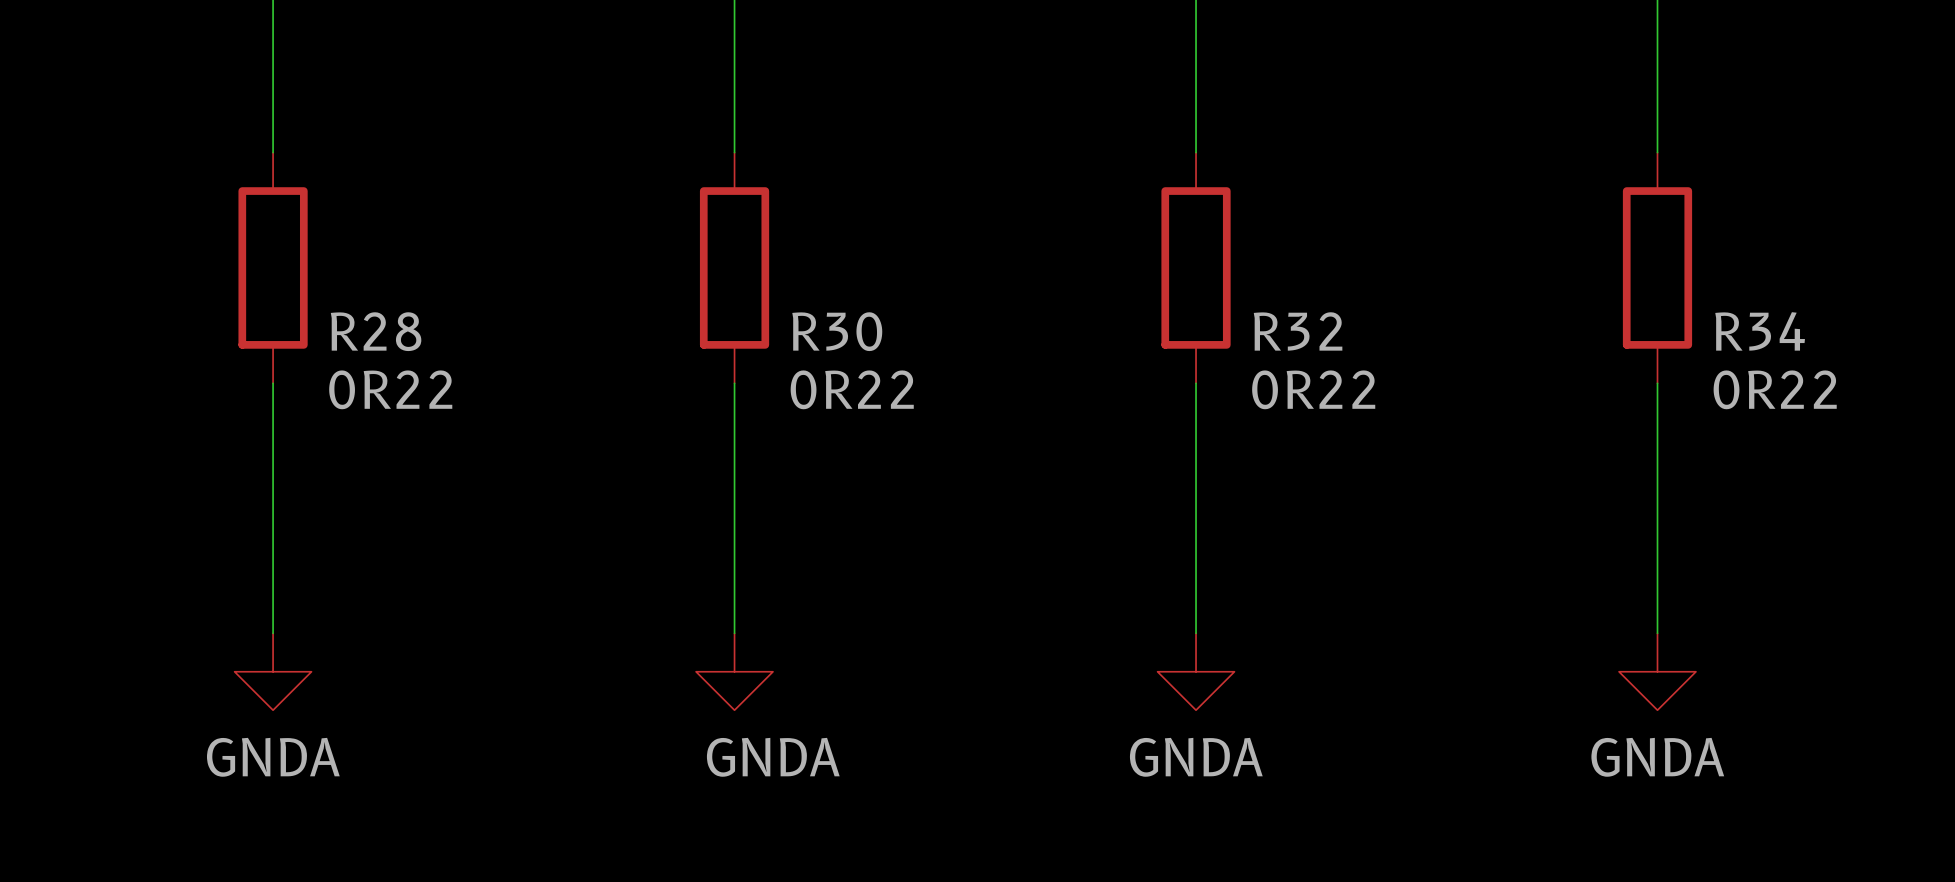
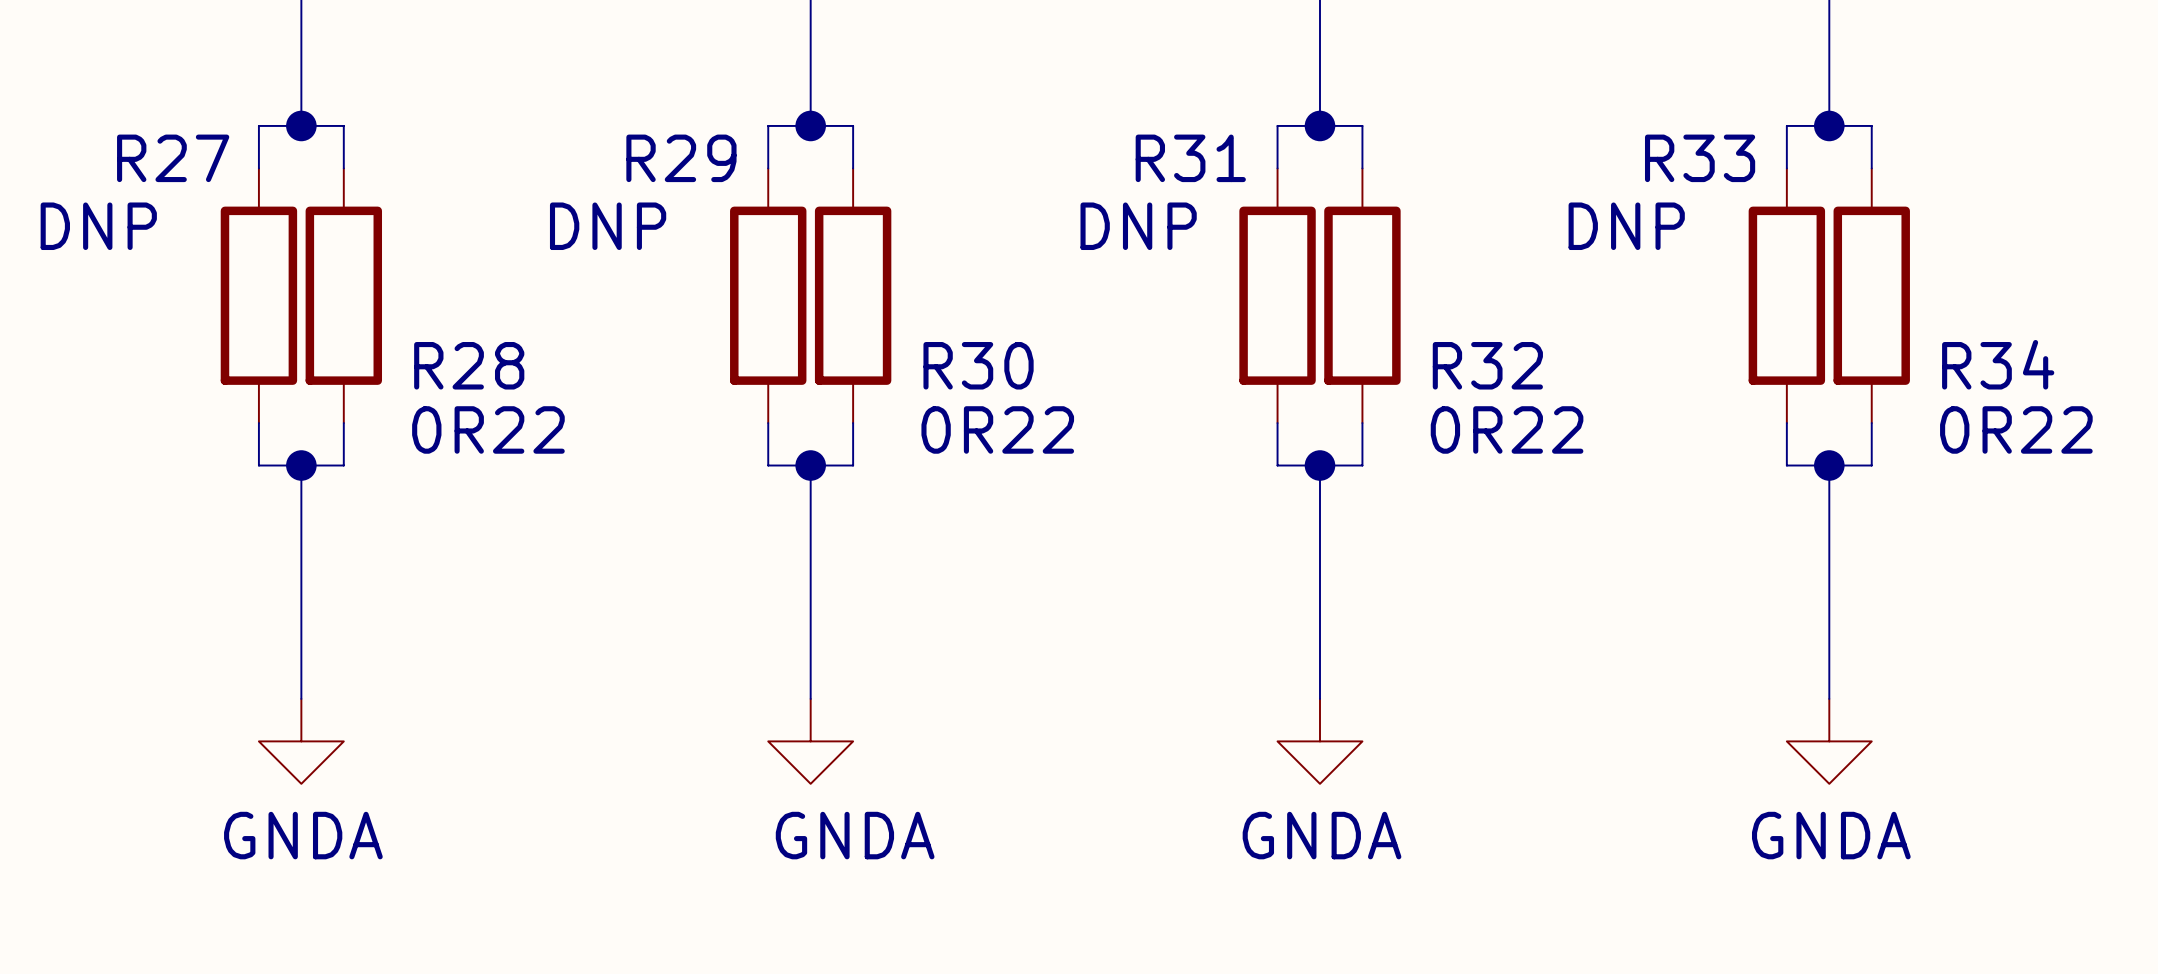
wire: (273, 114) (273, 152) -> none
junction: none -> (301, 125)
wire: (734, 114) (734, 152) -> none
junction: none -> (810, 125)
wire: (1196, 114) (1196, 152) -> none
junction: none -> (1319, 125)
wire: (1657, 114) (1657, 152) -> none
junction: none -> (1829, 125)
wire: none -> (258, 168) (258, 125) (343, 125) (343, 168)
wire: none -> (768, 168) (768, 125) (853, 125) (853, 168)
wire: none -> (1277, 168) (1277, 125) (1362, 125) (1362, 168)
wire: none -> (1786, 168) (1786, 125) (1871, 125) (1871, 168)
R27: none -> DNP (258, 295)
R28 position: (273, 267) -> (343, 295)
R29: none -> DNP (768, 295)
R30 position: (734, 267) -> (853, 295)
R31: none -> DNP (1277, 295)
R32 position: (1196, 267) -> (1362, 295)
R33: none -> DNP (1786, 295)
R34 position: (1657, 267) -> (1871, 295)
wire: none -> (258, 423) (258, 465) (343, 465) (343, 423)
wire: (273, 383) (273, 421) -> none
wire: none -> (768, 423) (768, 465) (853, 465) (853, 423)
wire: (734, 383) (734, 421) -> none
wire: none -> (1277, 423) (1277, 465) (1362, 465) (1362, 423)
wire: (1196, 383) (1196, 421) -> none
wire: none -> (1786, 423) (1786, 465) (1871, 465) (1871, 423)
wire: (1657, 383) (1657, 421) -> none
junction: none -> (301, 465)
junction: none -> (810, 465)
junction: none -> (1319, 465)
junction: none -> (1829, 465)

